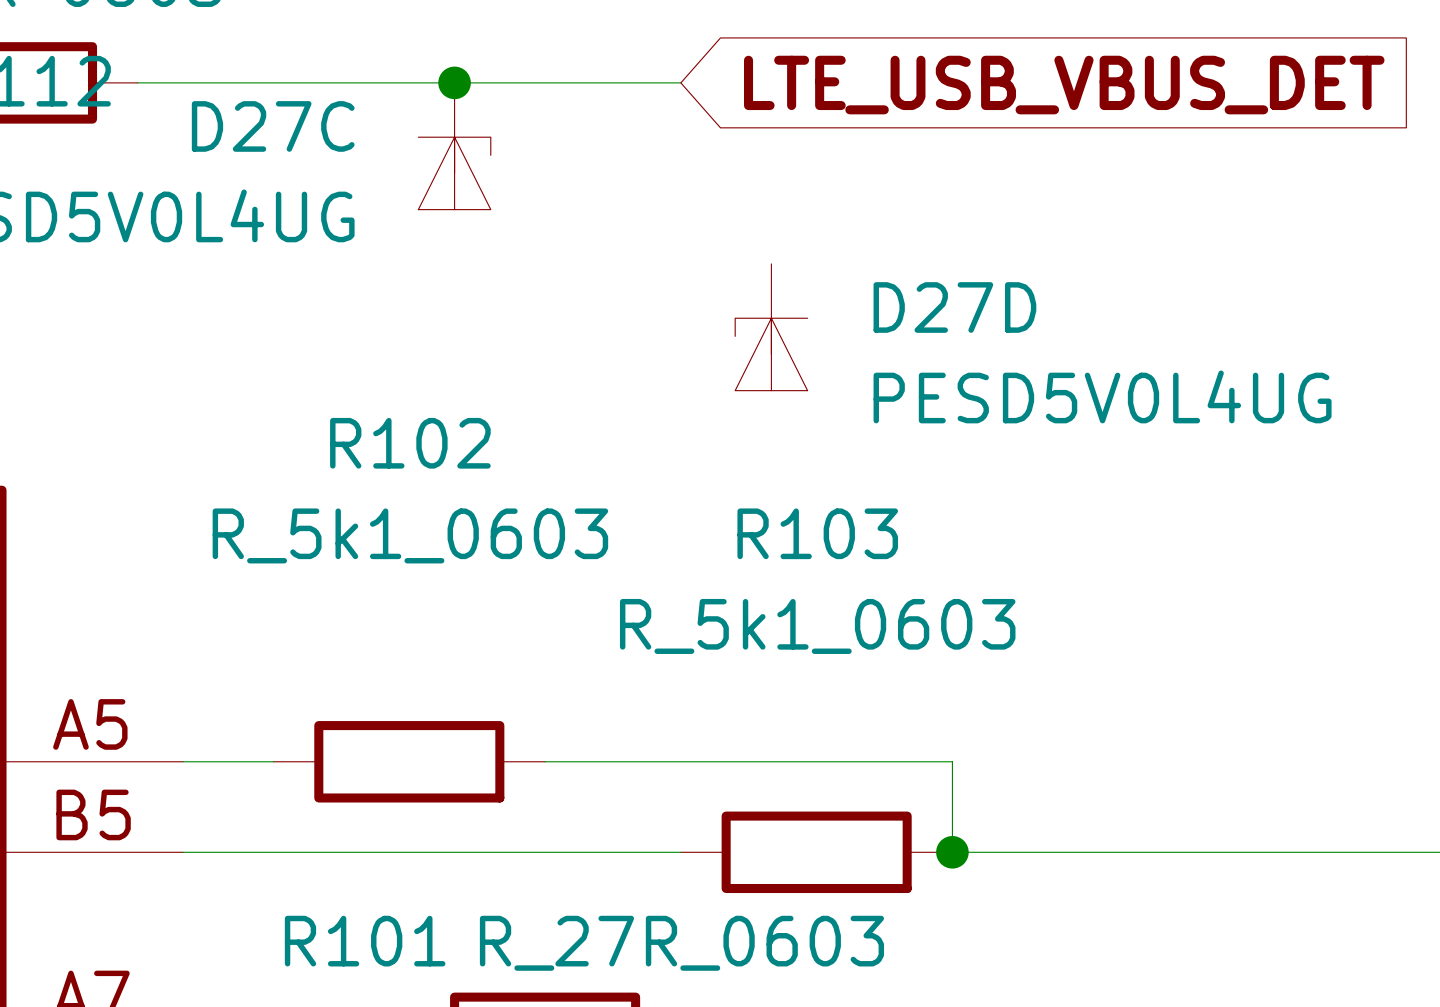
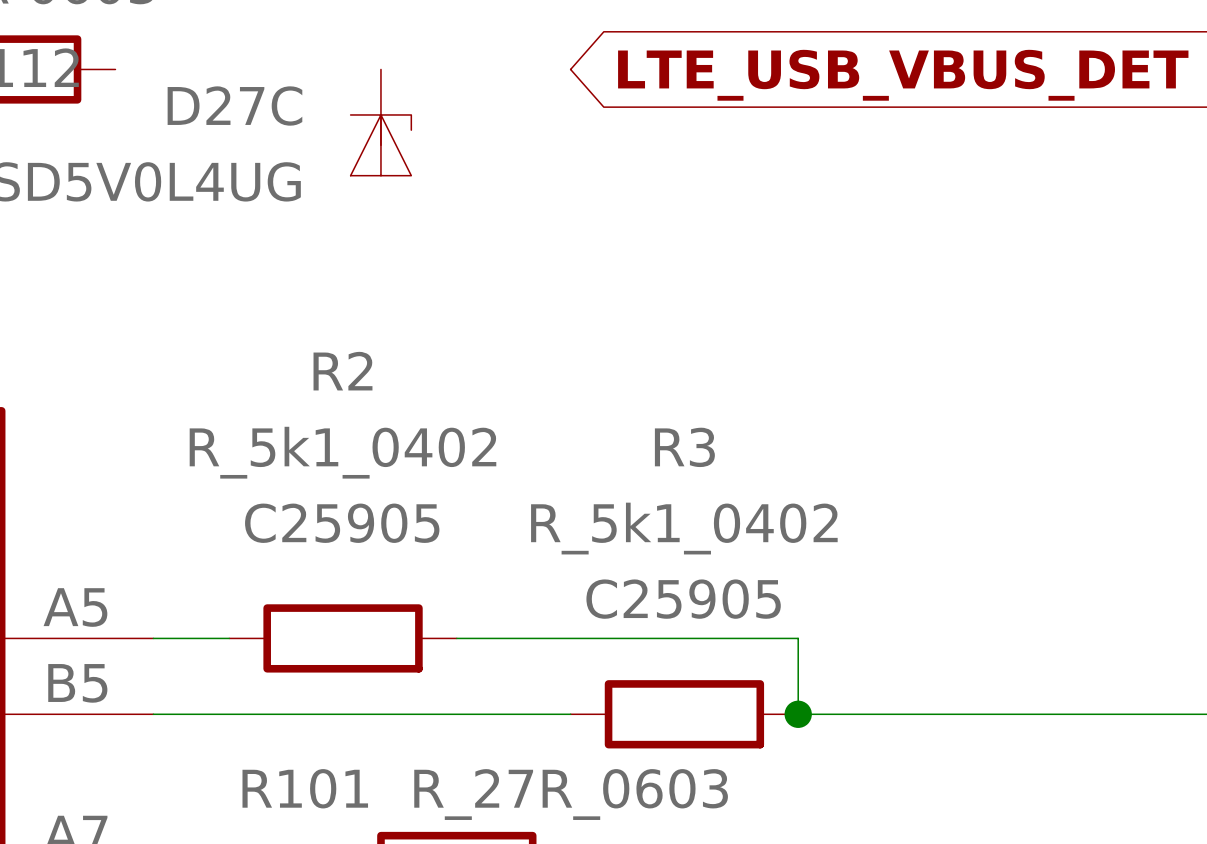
wire: (137, 82) (680, 82) -> none
junction: (454, 82) -> none
D27D: PESD5V0L4UG (771, 327) -> none
R102 name: R102 (410, 443) -> R2 (342, 371)
R103 name: R103 (817, 533) -> R3 (684, 447)
R102 value: R_5k1_0603 (410, 535) -> R_5k1_0402 (342, 452)
R102 text: none -> C25905 (342, 523)
R103 value: R_5k1_0603 (817, 626) -> R_5k1_0402 (684, 528)
R103 text: none -> C25905 (683, 599)

